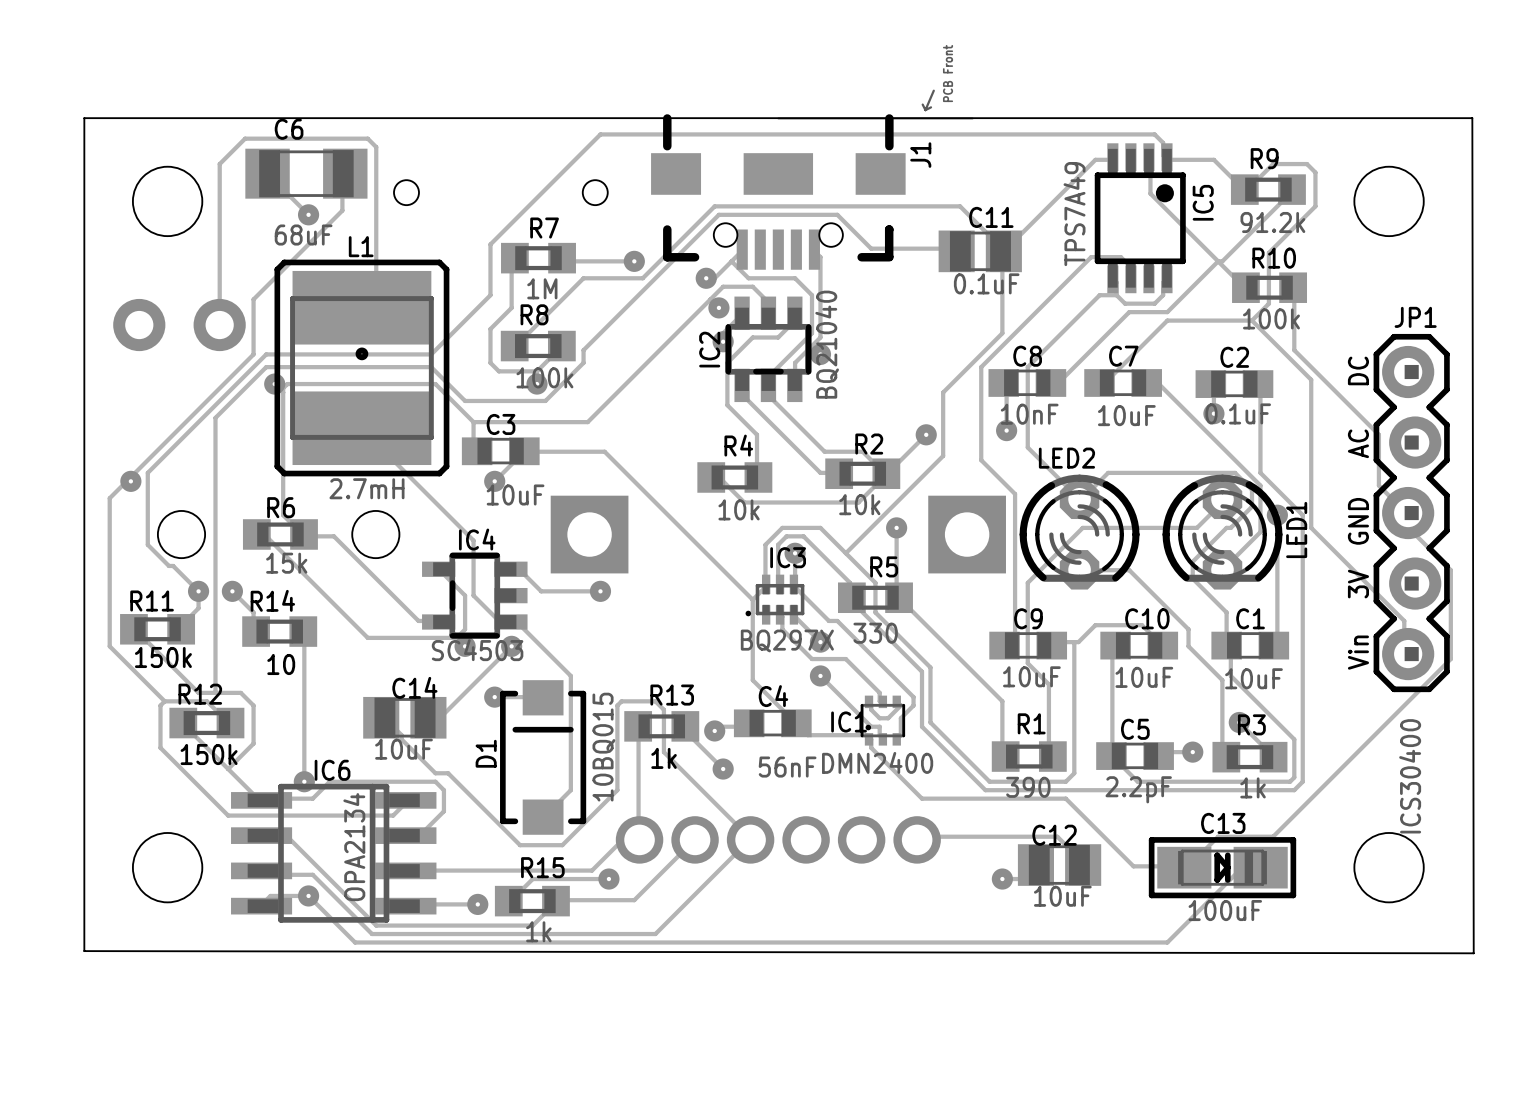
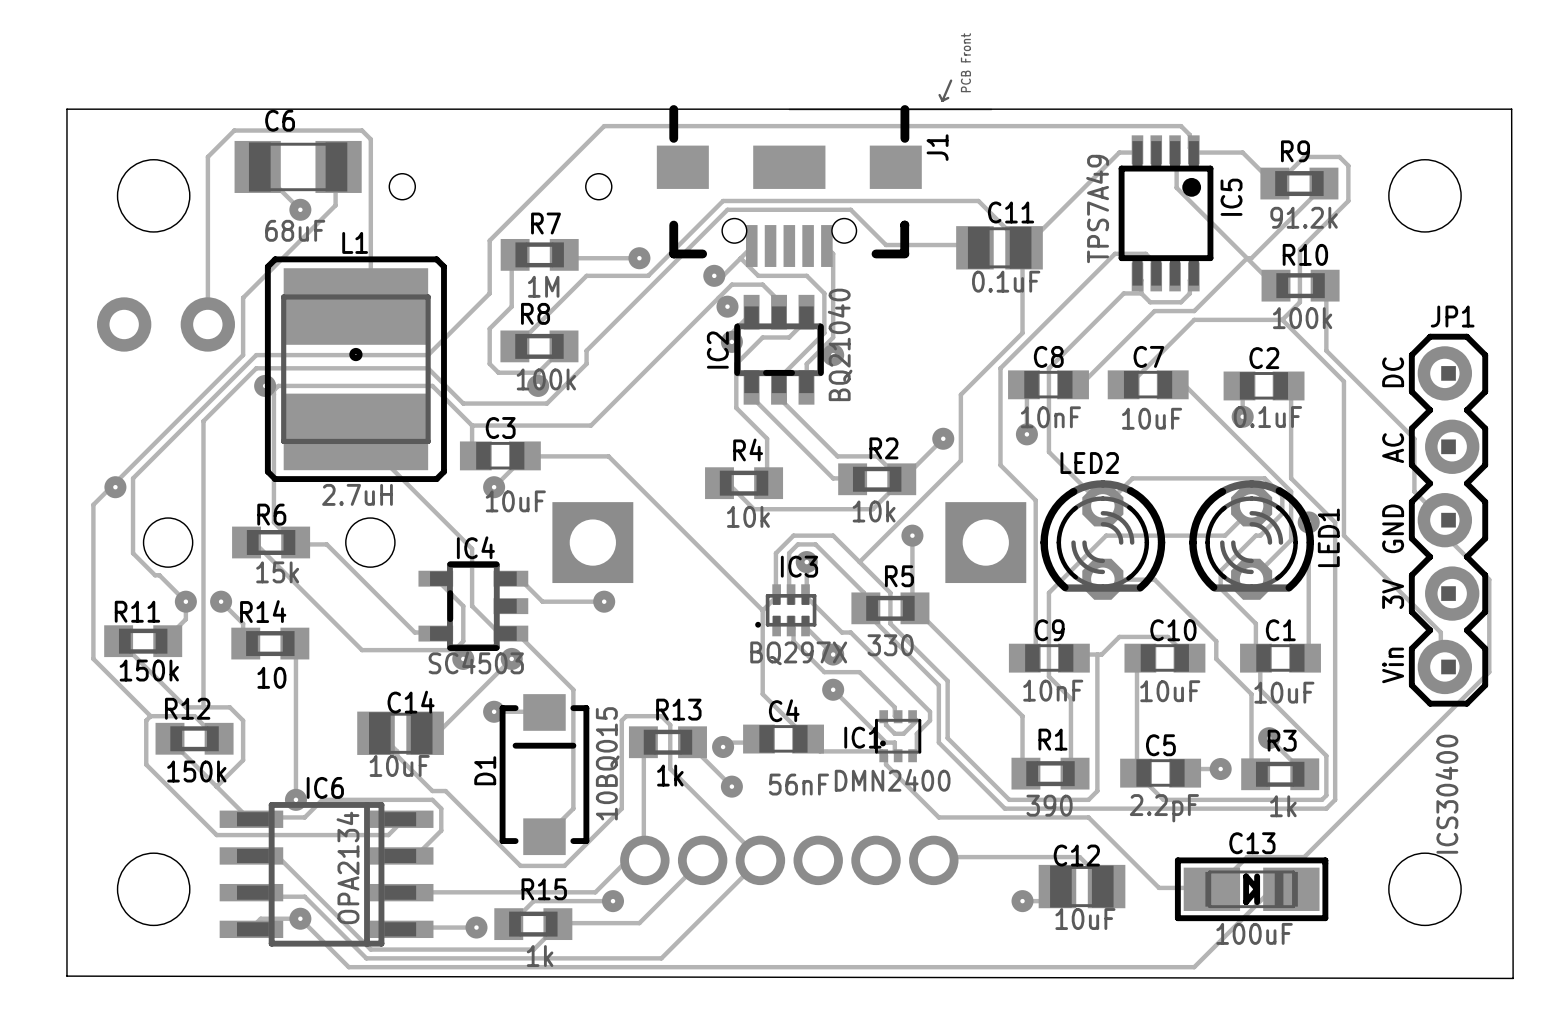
L1 value: 2.7mH (366, 488) -> 2.7uH (357, 494)
C9 value: 10uF (1031, 676) -> 10nF (1053, 690)

